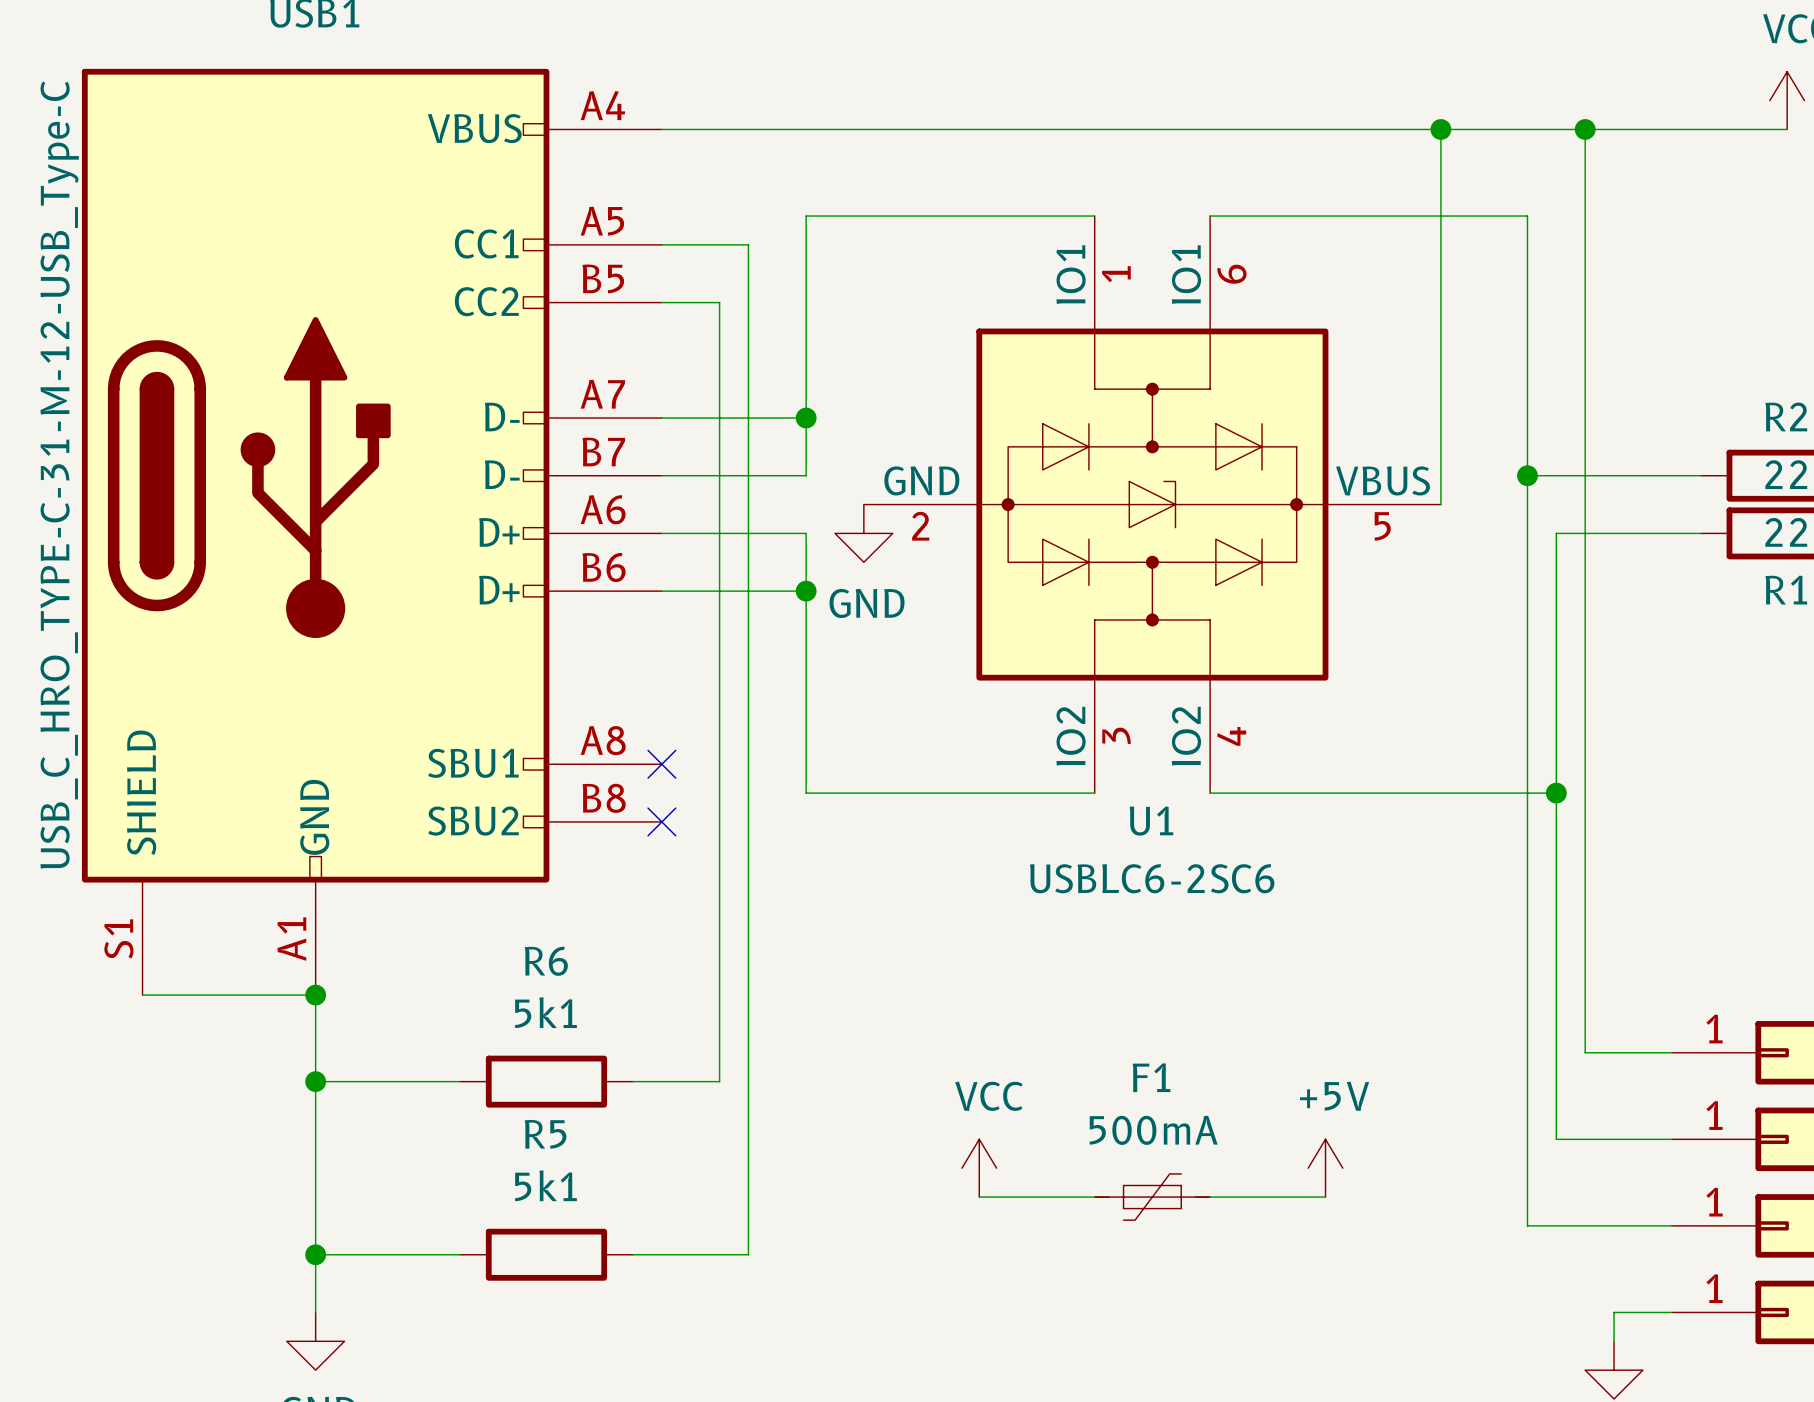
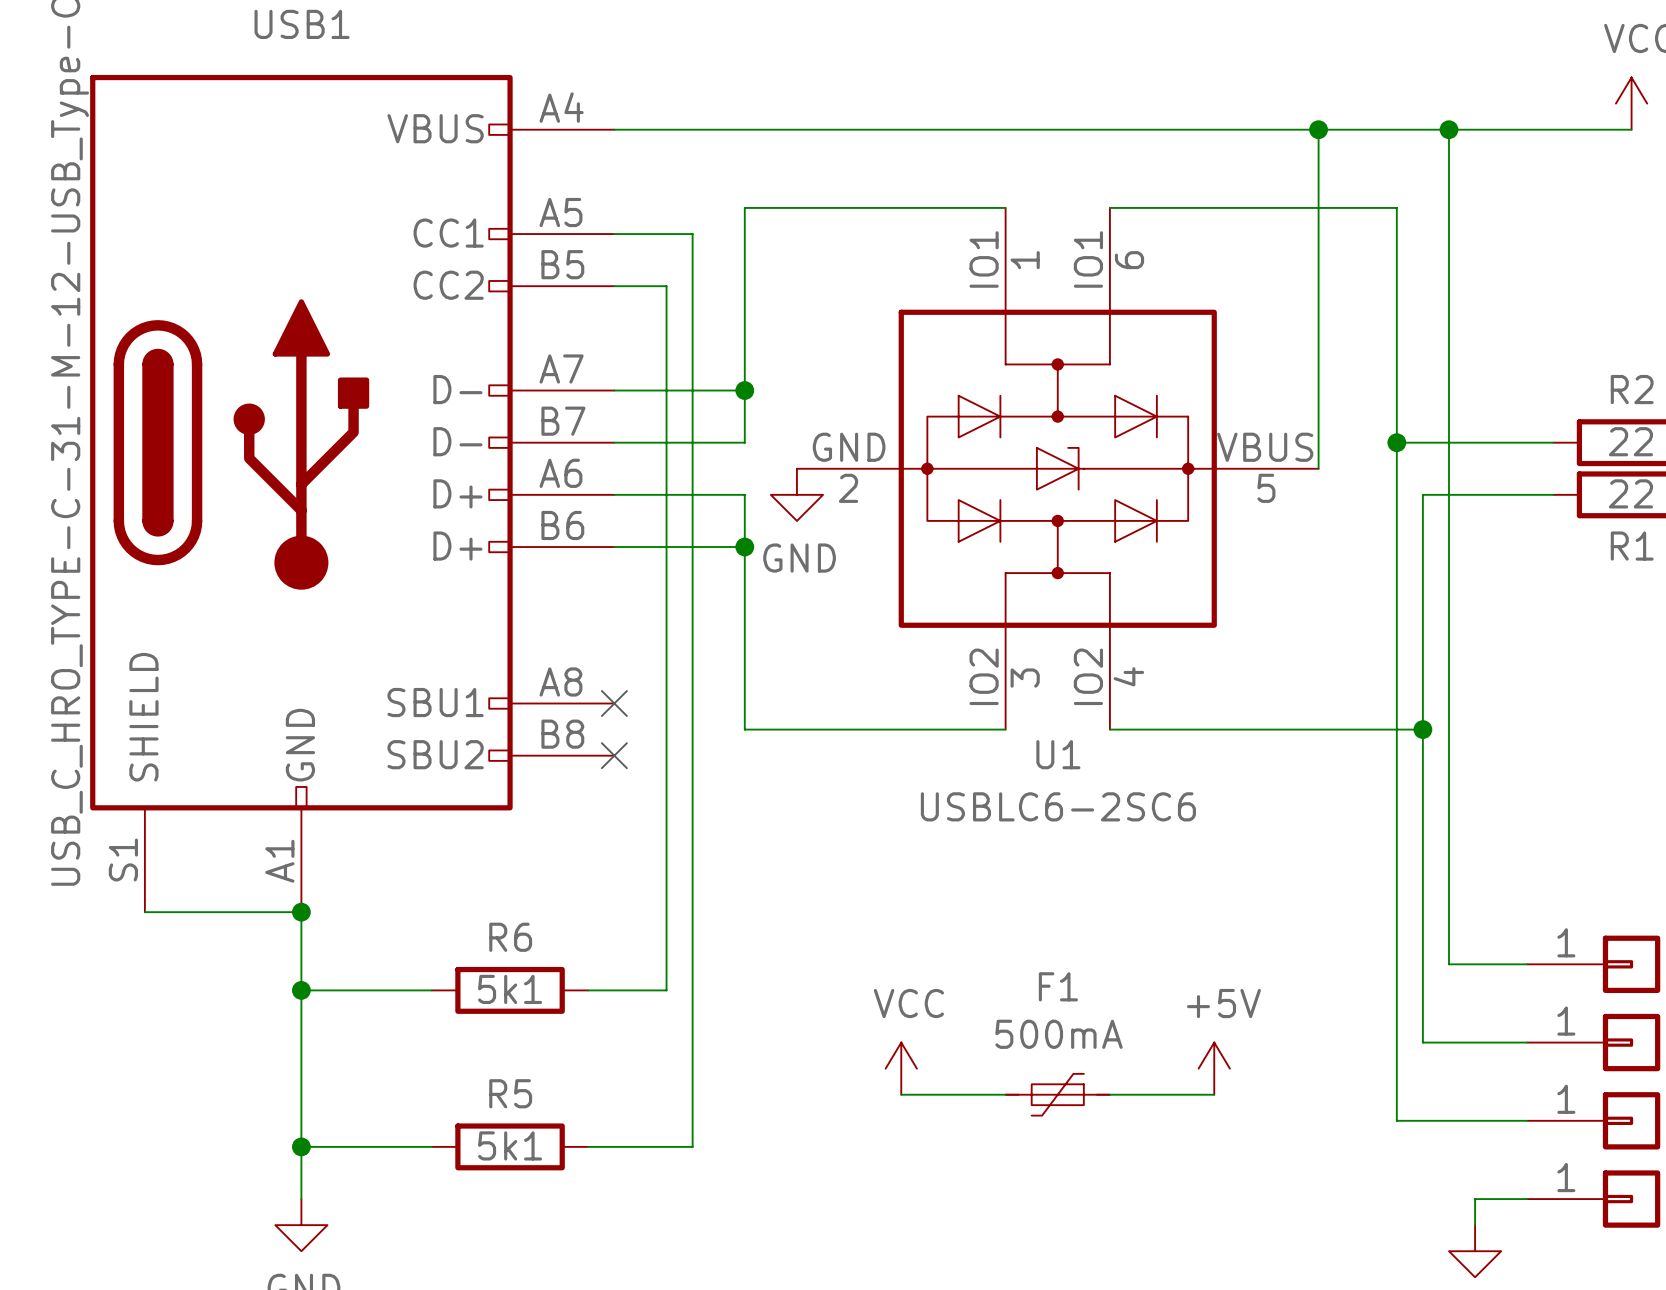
R6 name position: R6 (546, 961) -> R6 (510, 937)
R6 value position: 5k1 (546, 1012) -> 5k1 (510, 989)
R5 name position: R5 (545, 1134) -> R5 (510, 1093)
R5 value position: 5k1 (546, 1185) -> 5k1 (510, 1145)

